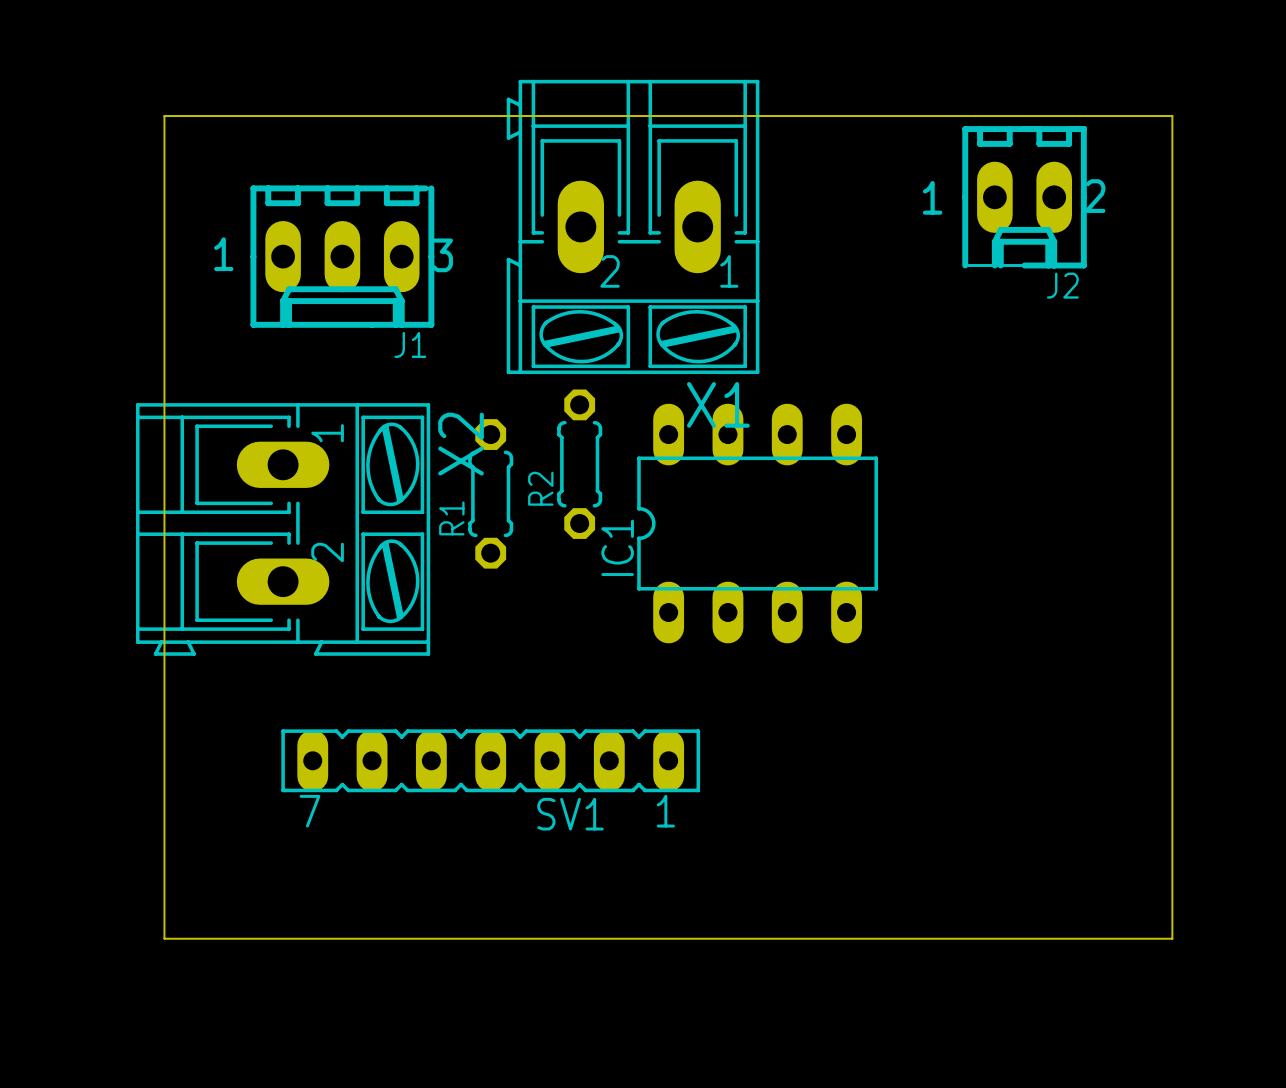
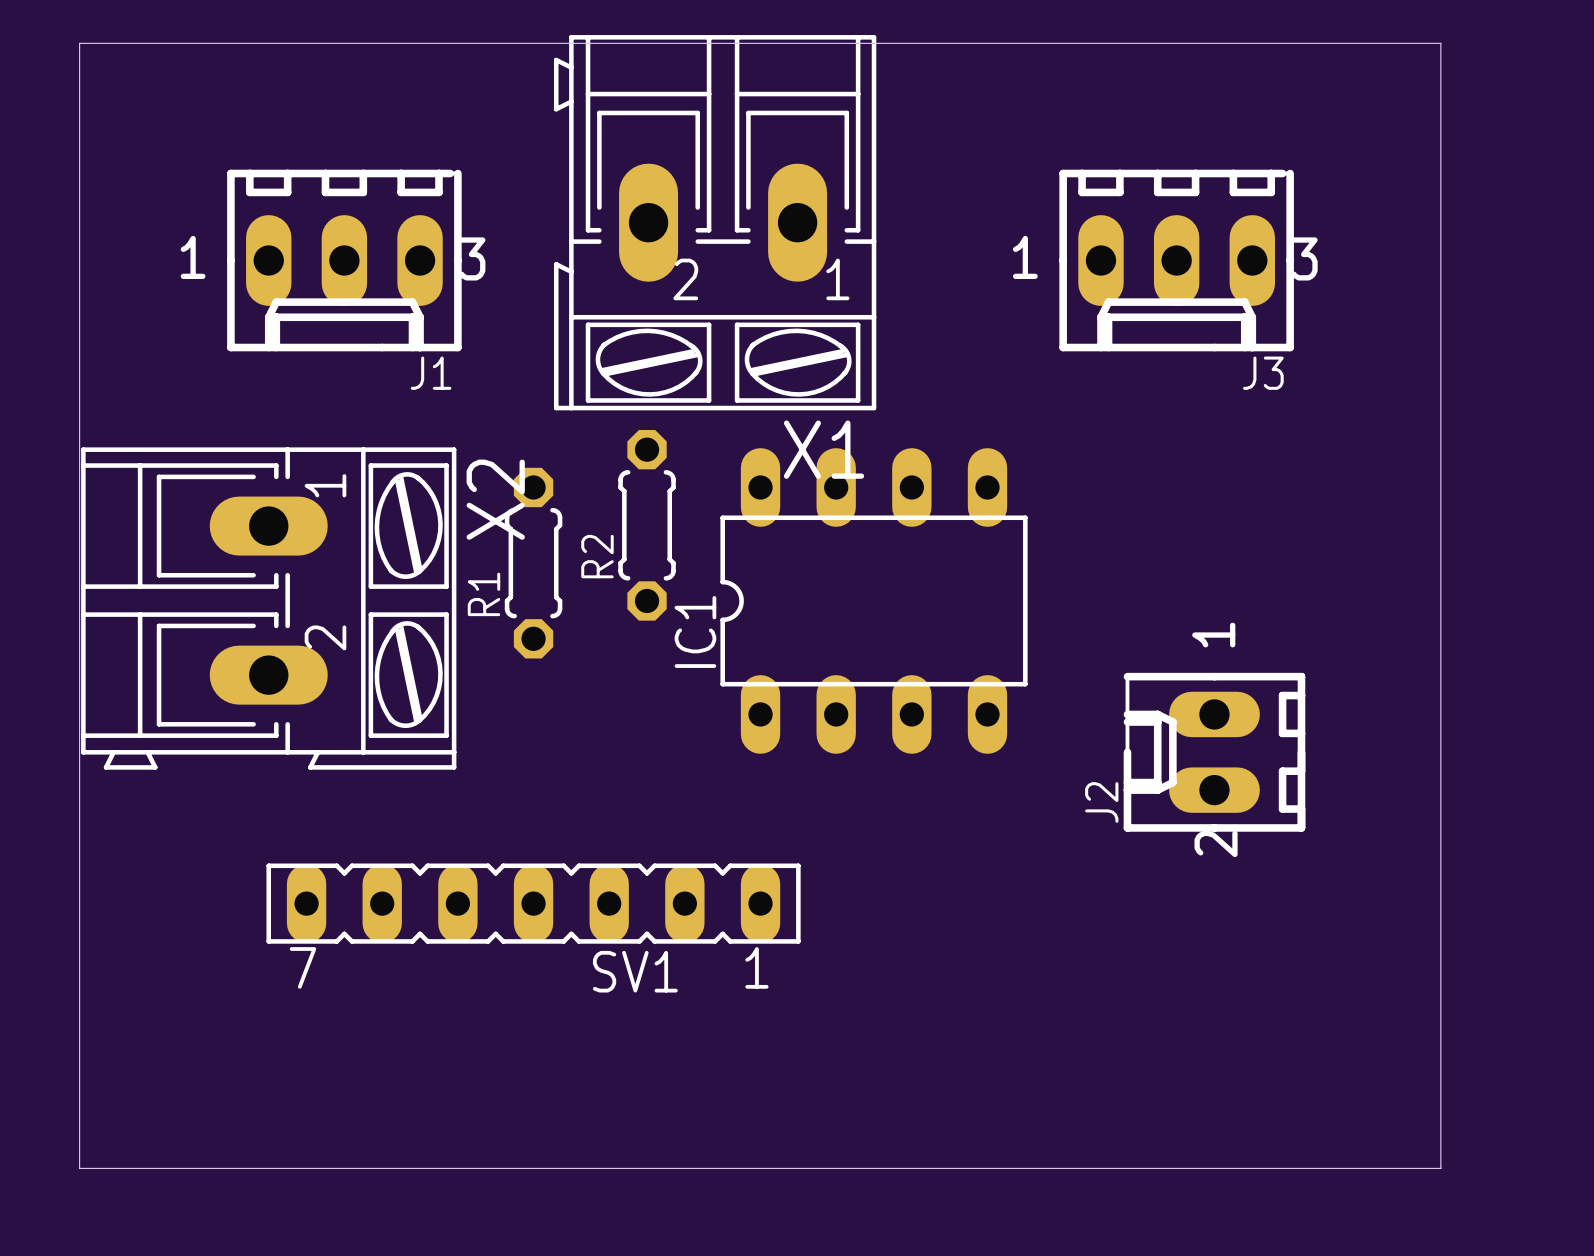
board edge: (164, 116) (1172, 116) (1172, 938) (164, 938) (164, 116) -> (79, 43) (79, 1168) (1440, 1168) (1440, 43) (79, 43)
J2 footprint: [962, 126, 1087, 269] -> [1123, 672, 1306, 832]
J3: none -> (1176, 260)
J2 name position: J2 (1062, 285) -> J2 (1101, 802)

